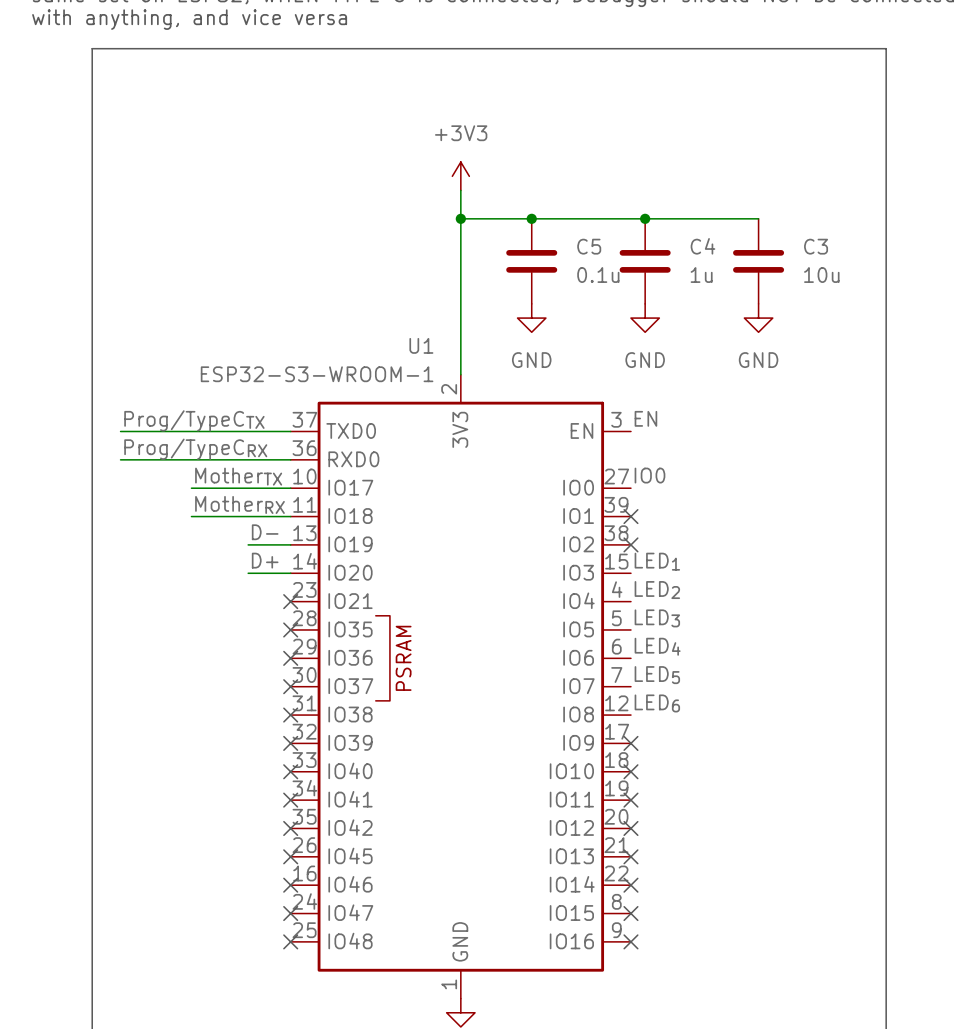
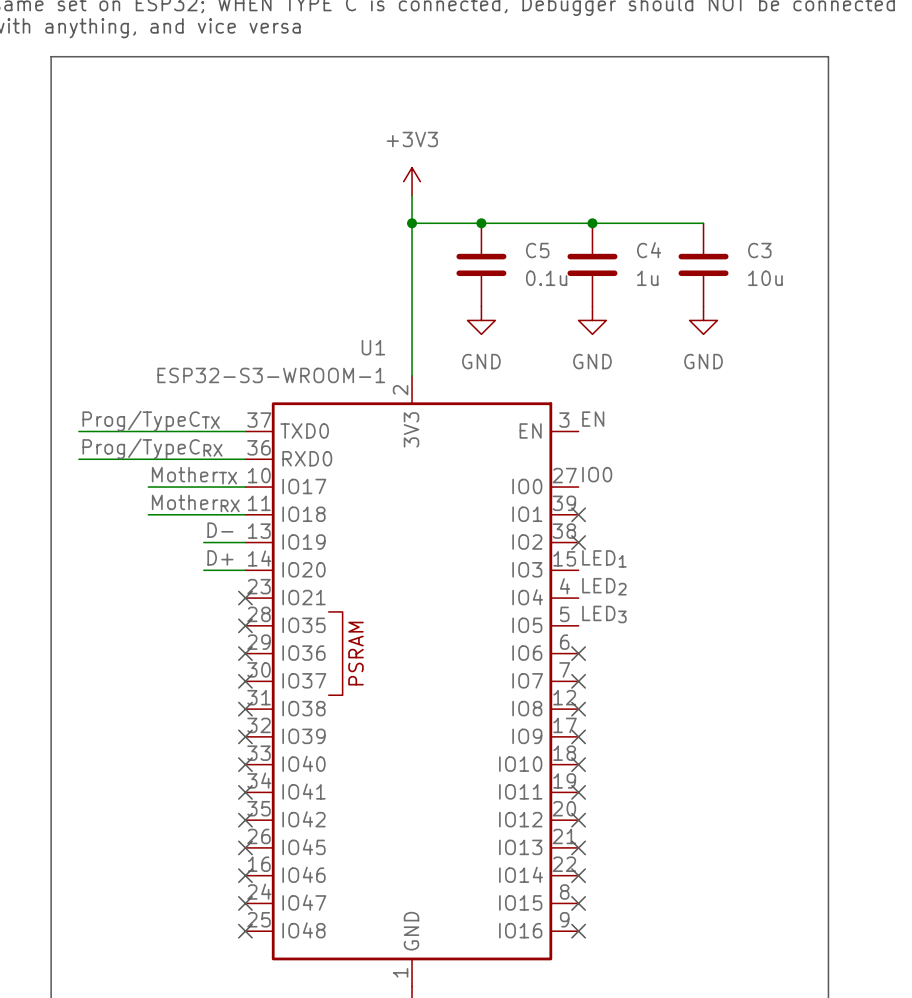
label: LED4 (657, 646) -> none
no-connect mark: none -> (578, 653)
label: LED5 (657, 675) -> none
no-connect mark: none -> (578, 681)
label: LED6 (657, 703) -> none
no-connect mark: none -> (578, 709)

